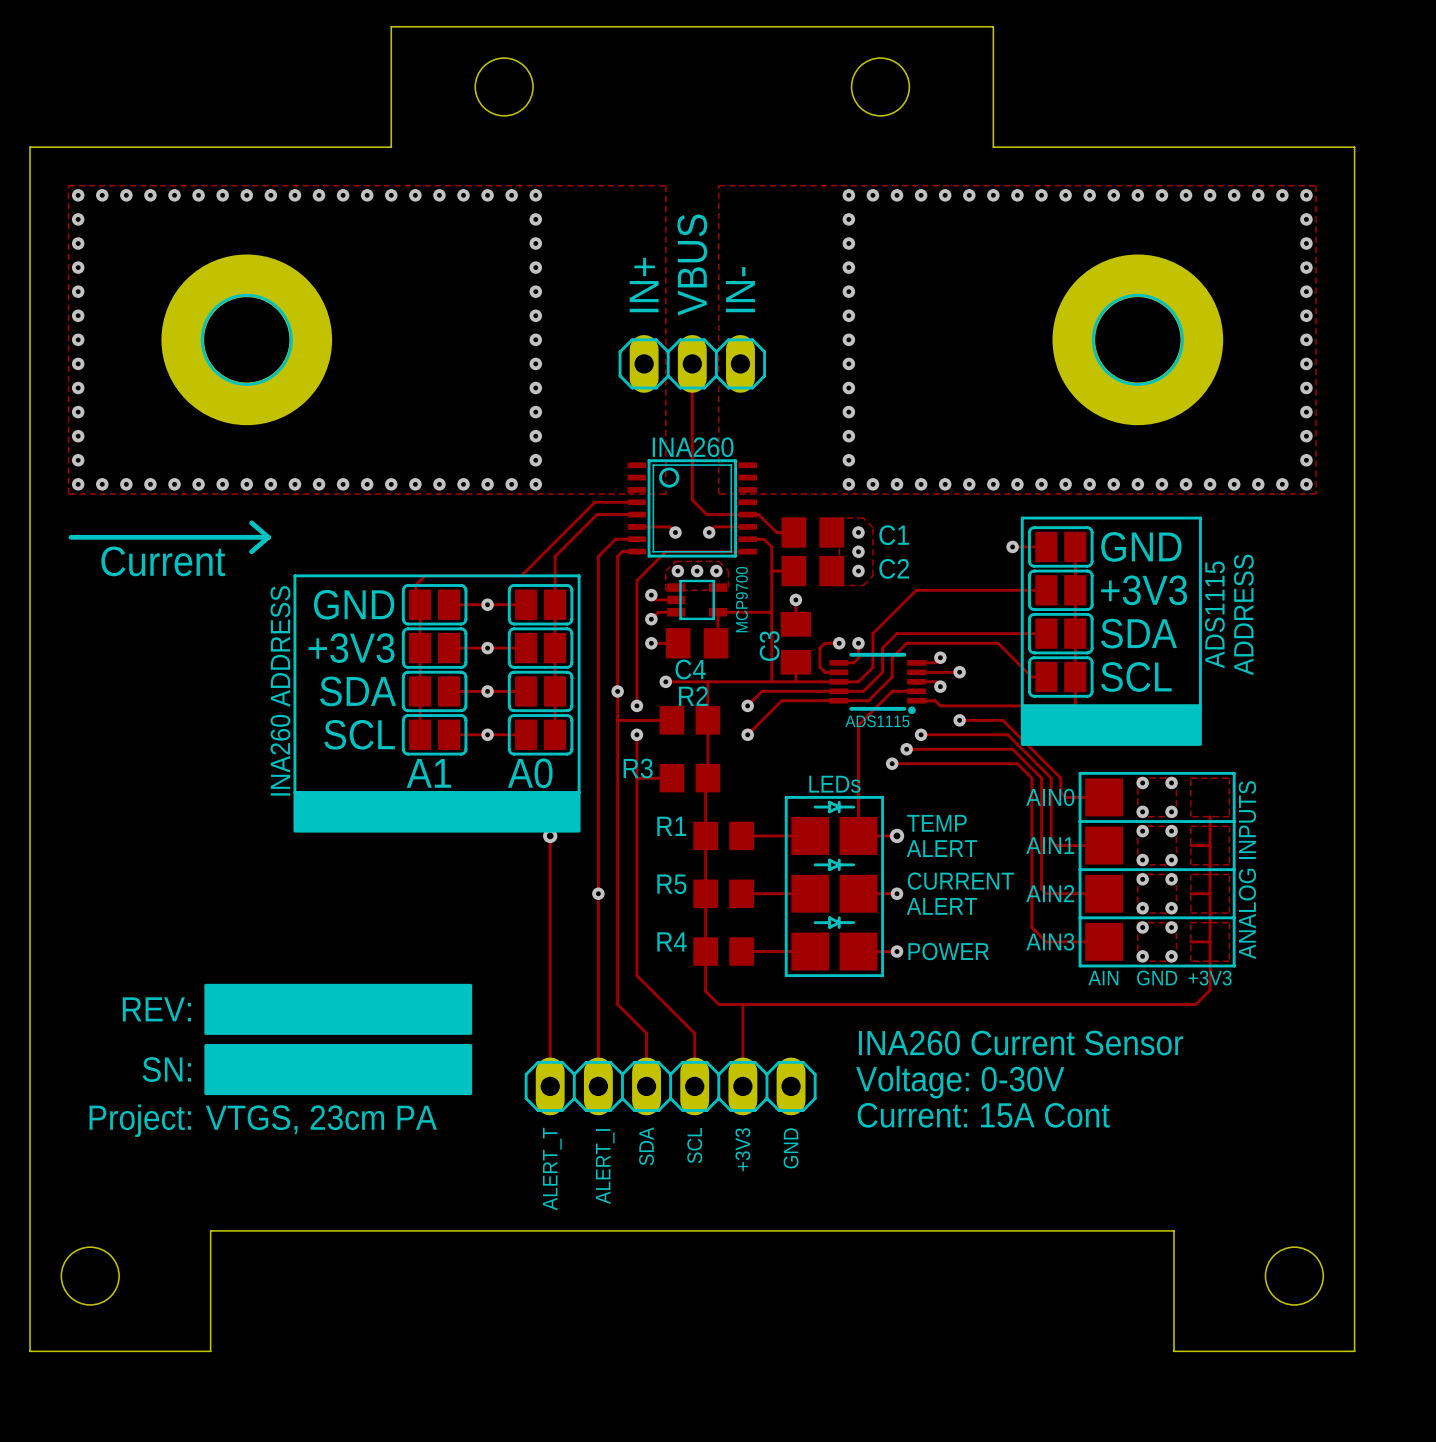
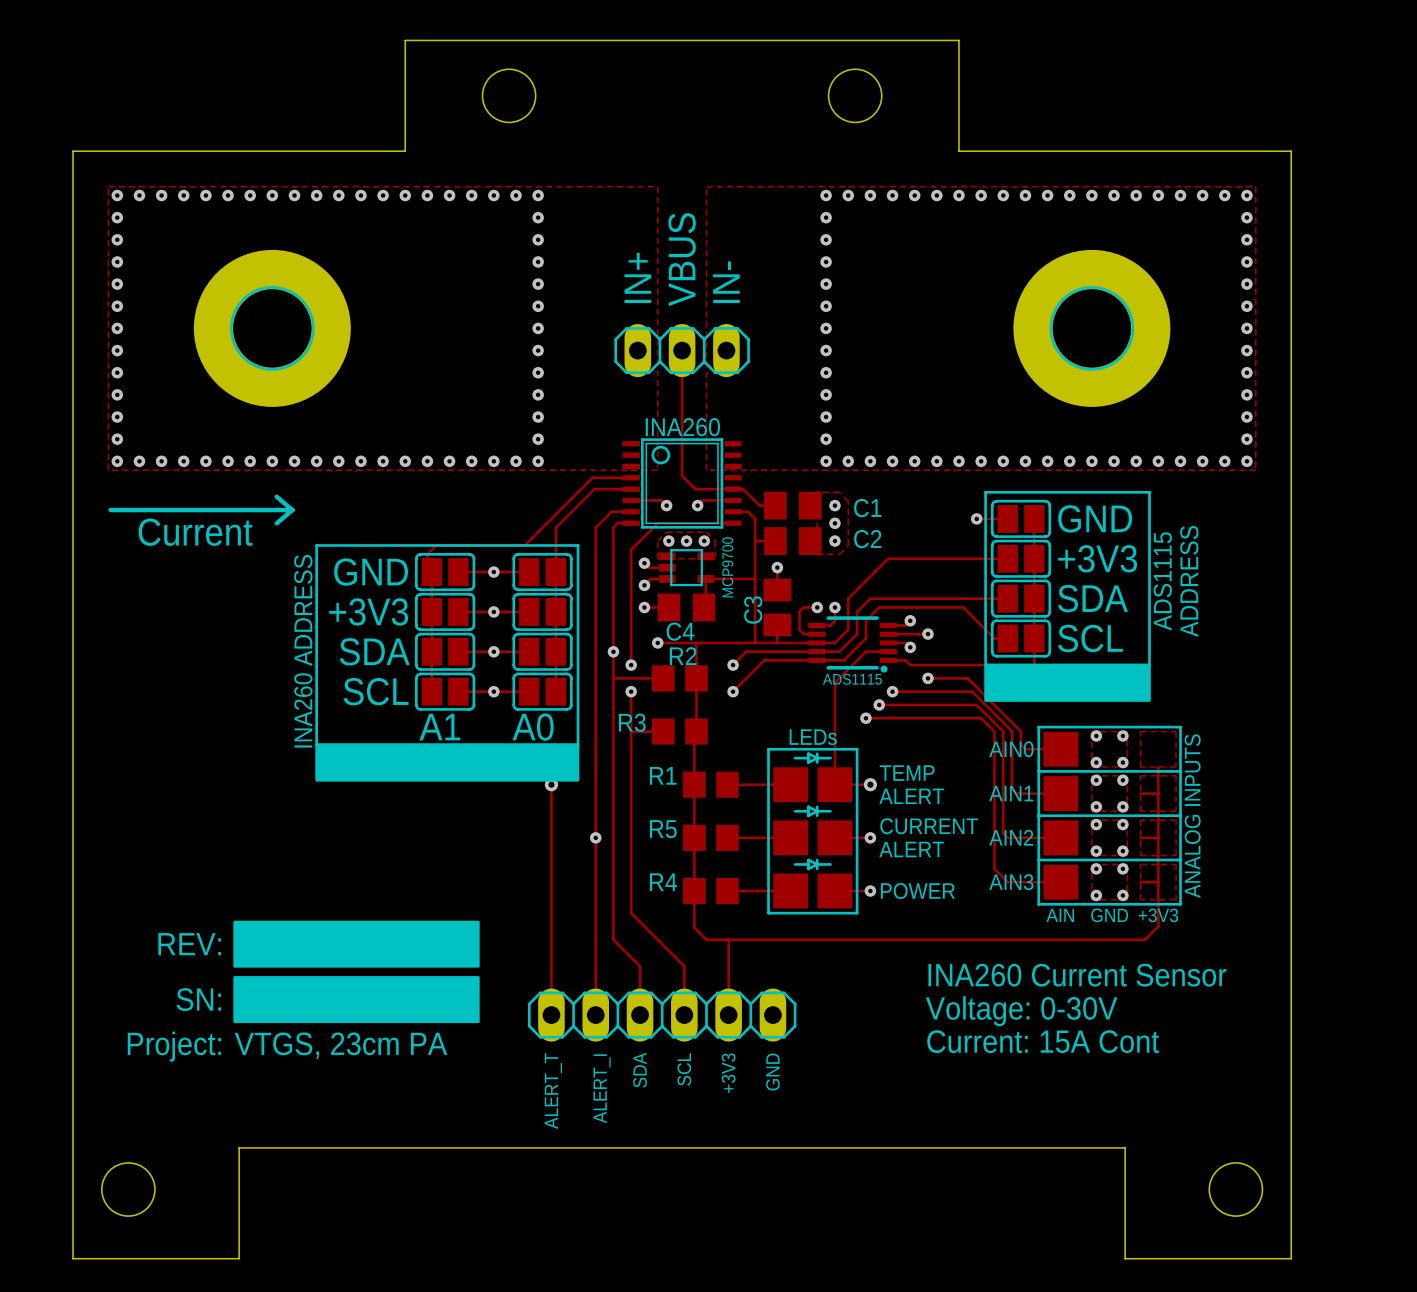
text position: INA260 Current Sensor (1021, 1043) -> INA260 Current Sensor (1077, 975)
text position: Voltage: 0-30V (960, 1082) -> Voltage: 0-30V (1021, 1011)
text position: Current: 15A Cont (983, 1115) -> Current: 15A Cont (1043, 1041)

